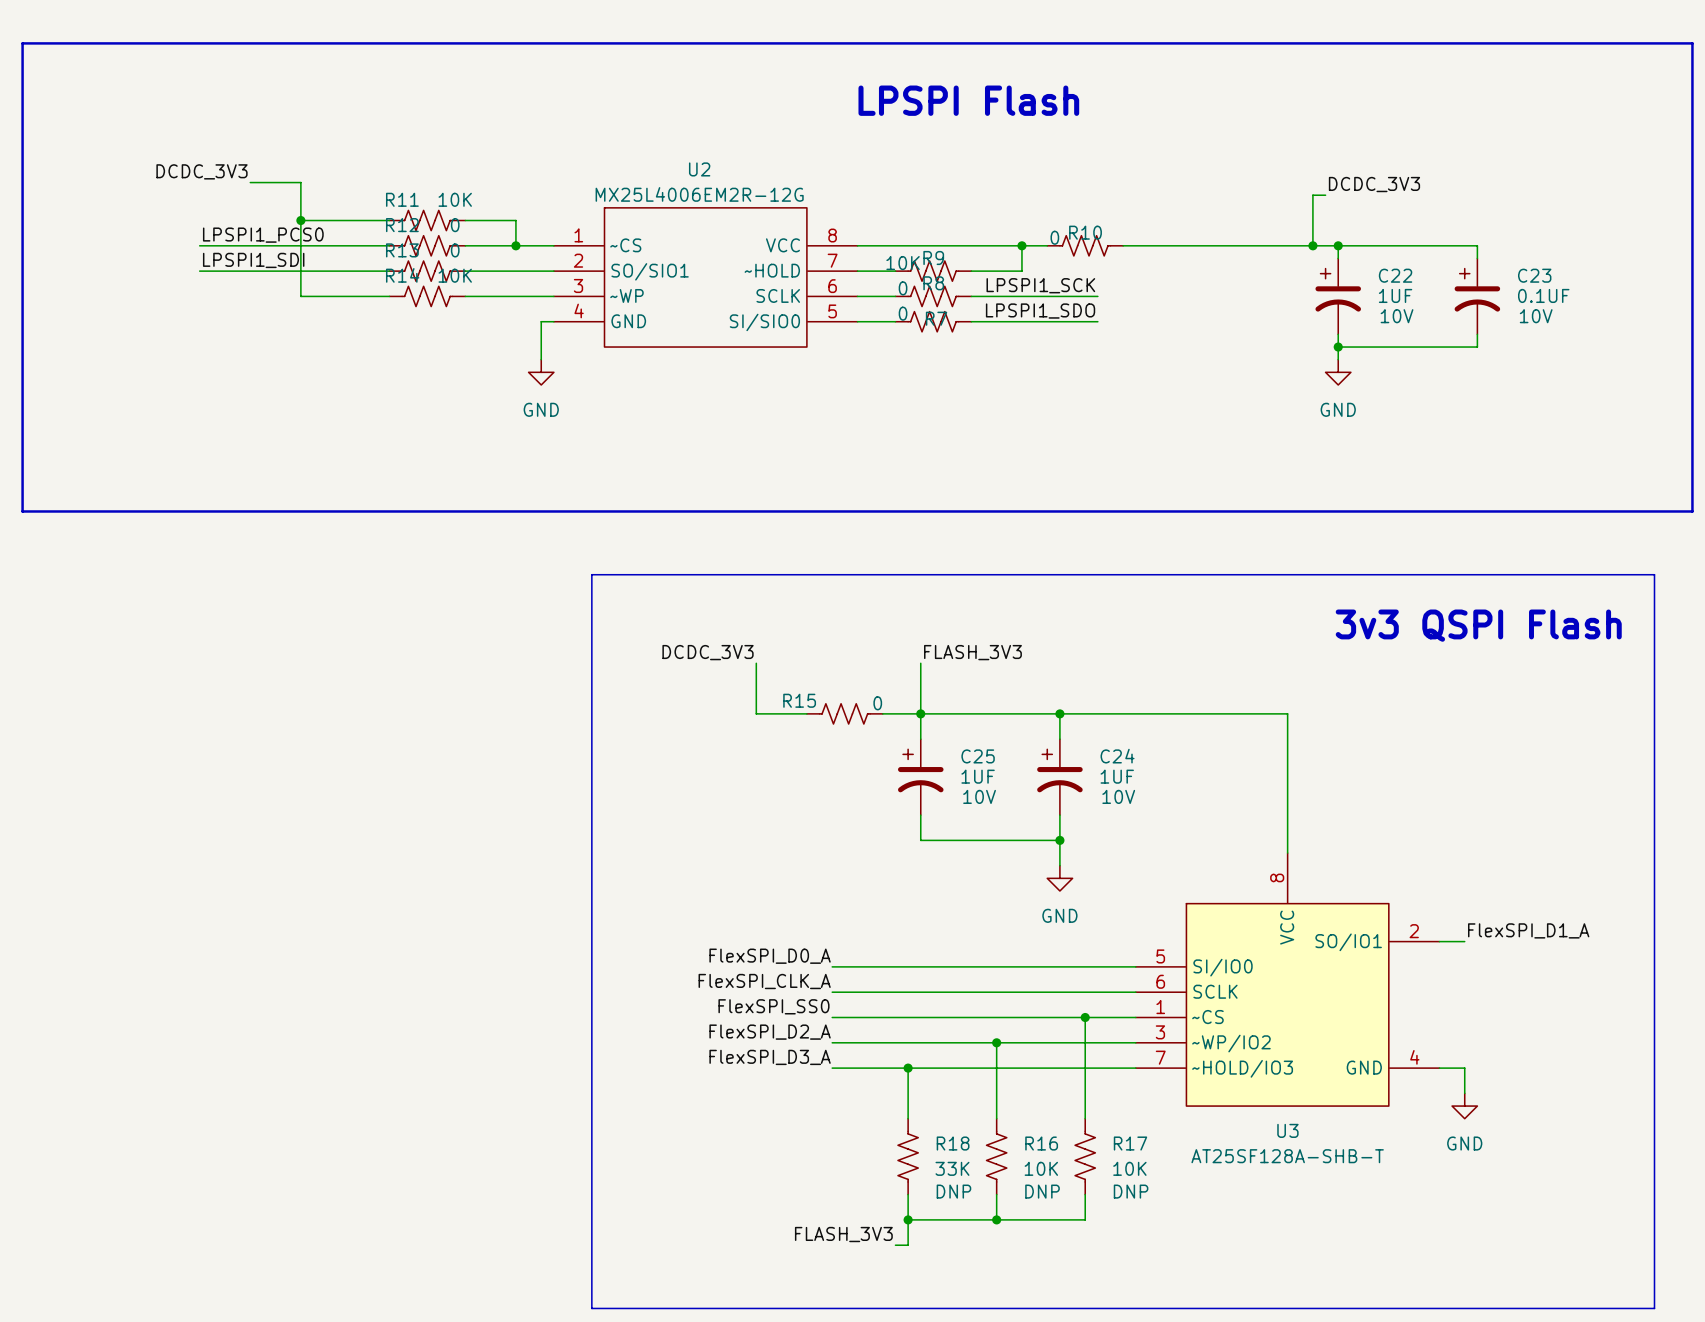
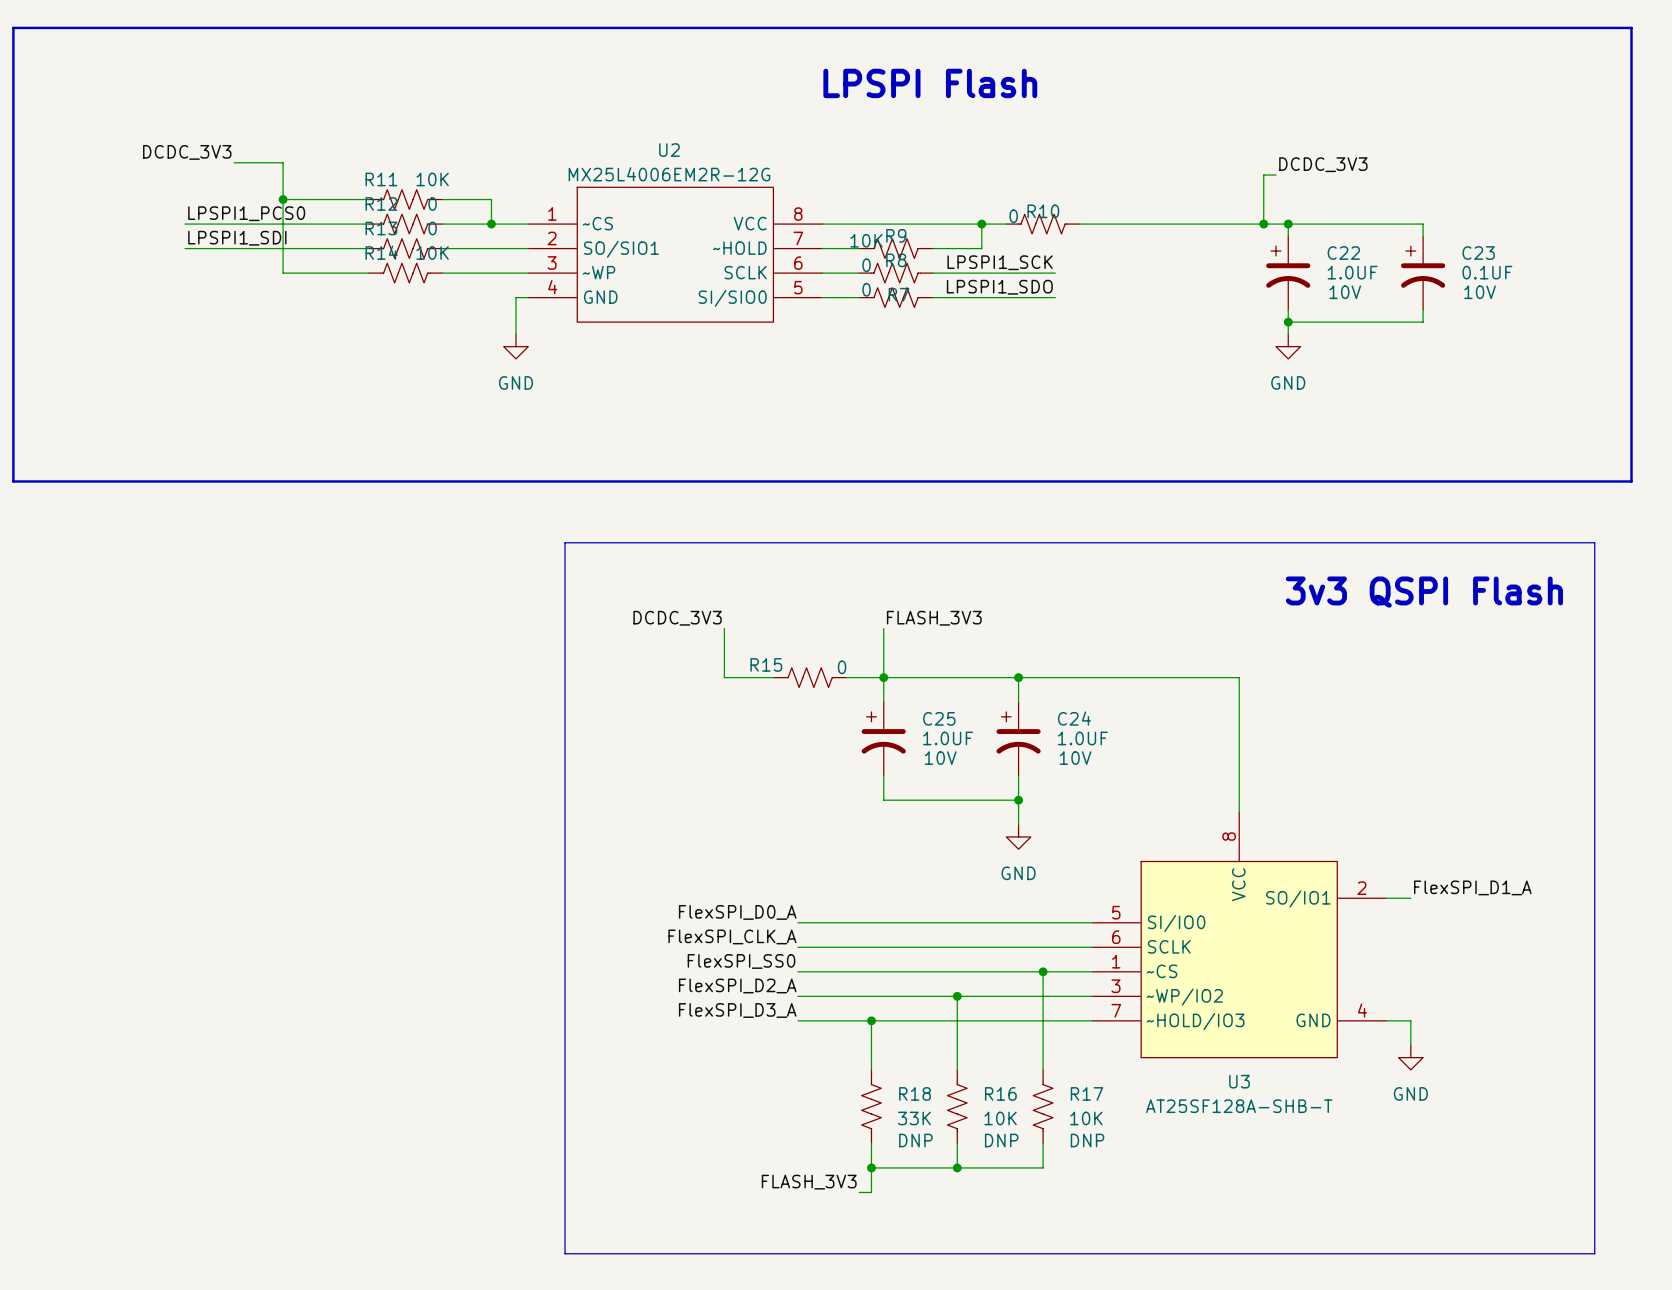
C22 value: 1UF (1395, 295) -> 1.0UF (1352, 272)
C25 value: 1UF (978, 776) -> 1.0UF (948, 738)
C24 value: 1UF (1117, 776) -> 1.0UF (1082, 738)

